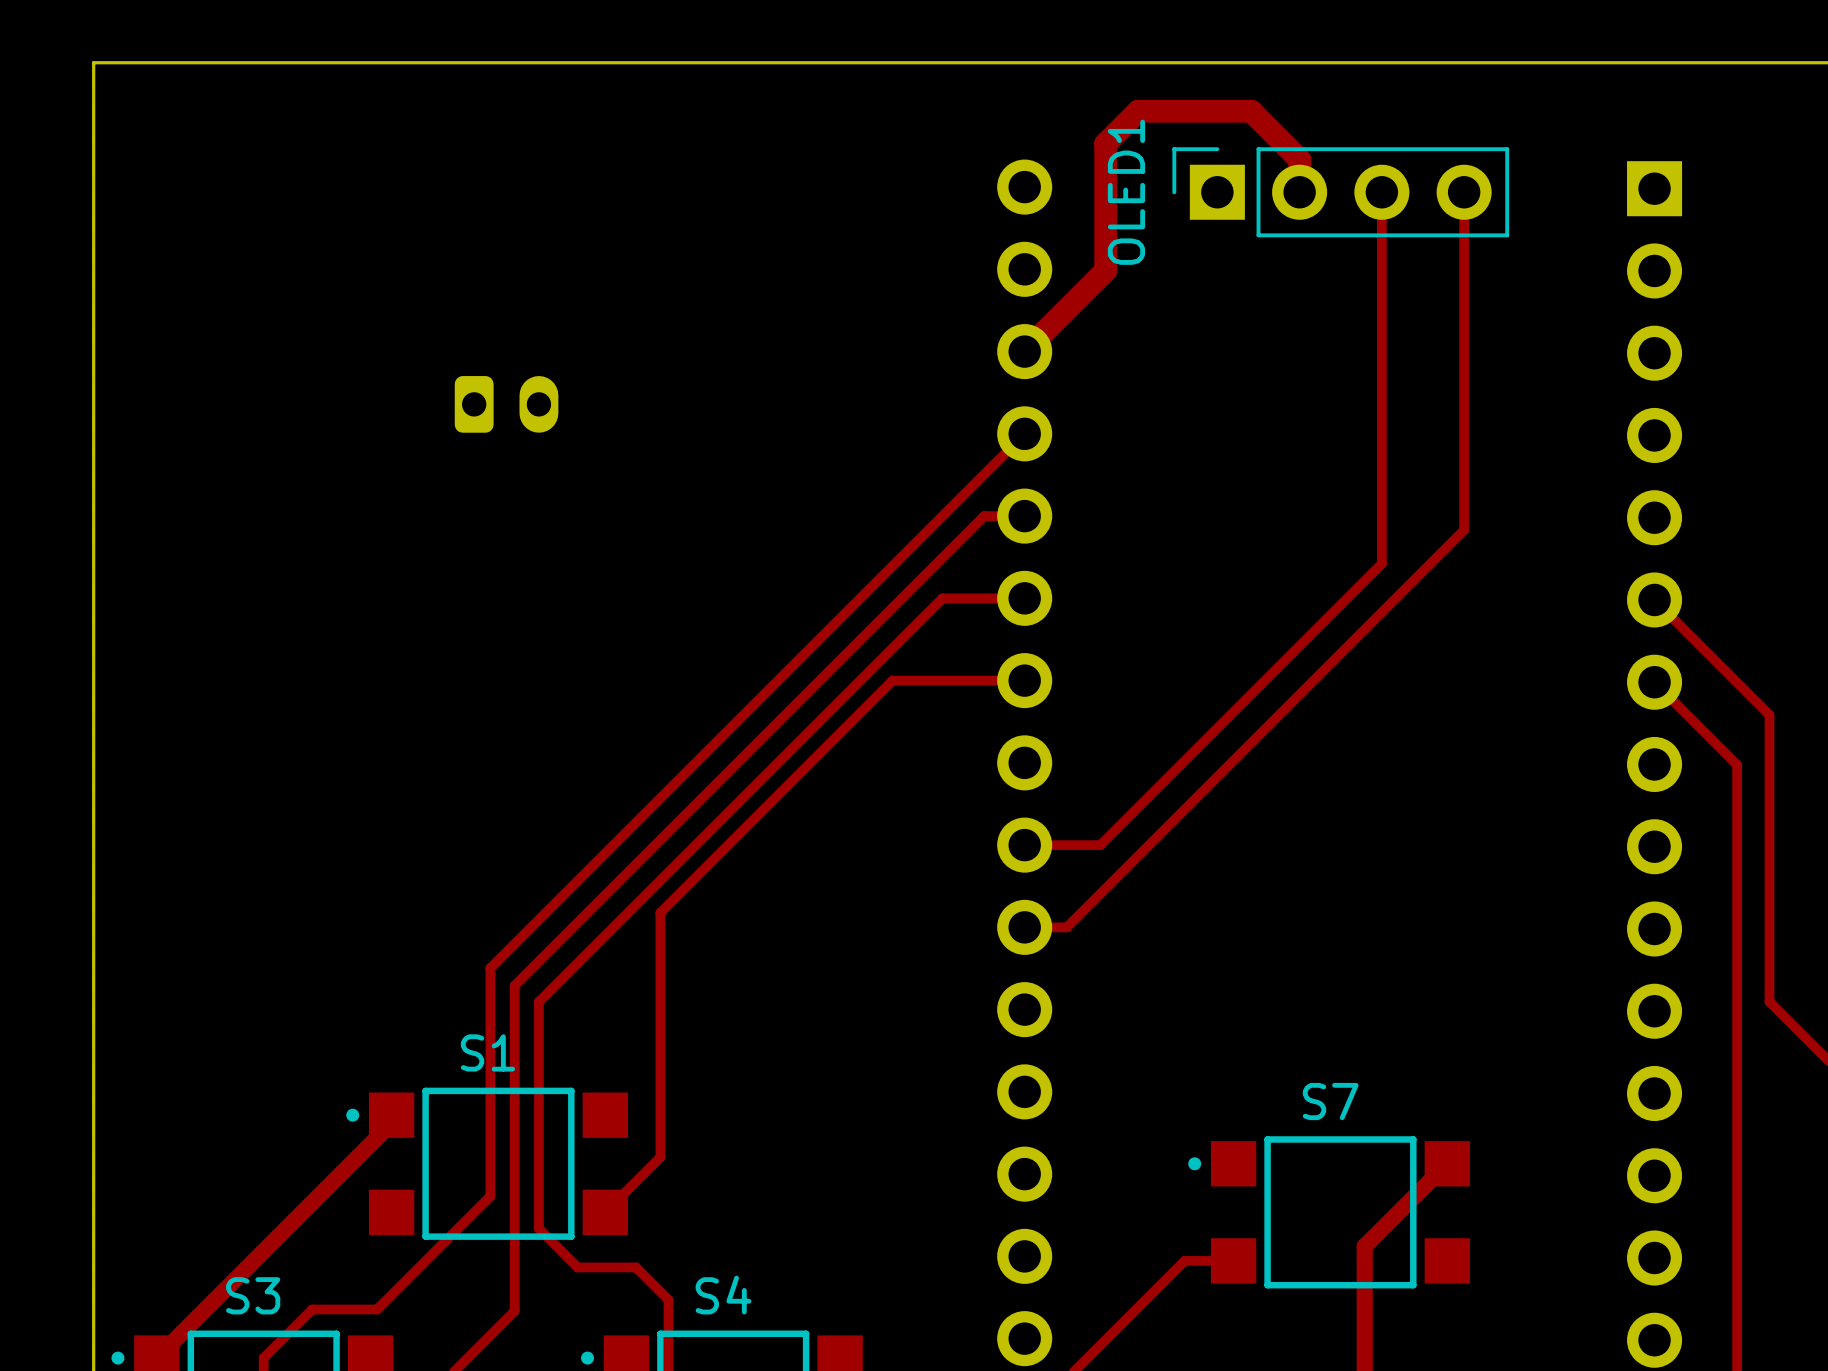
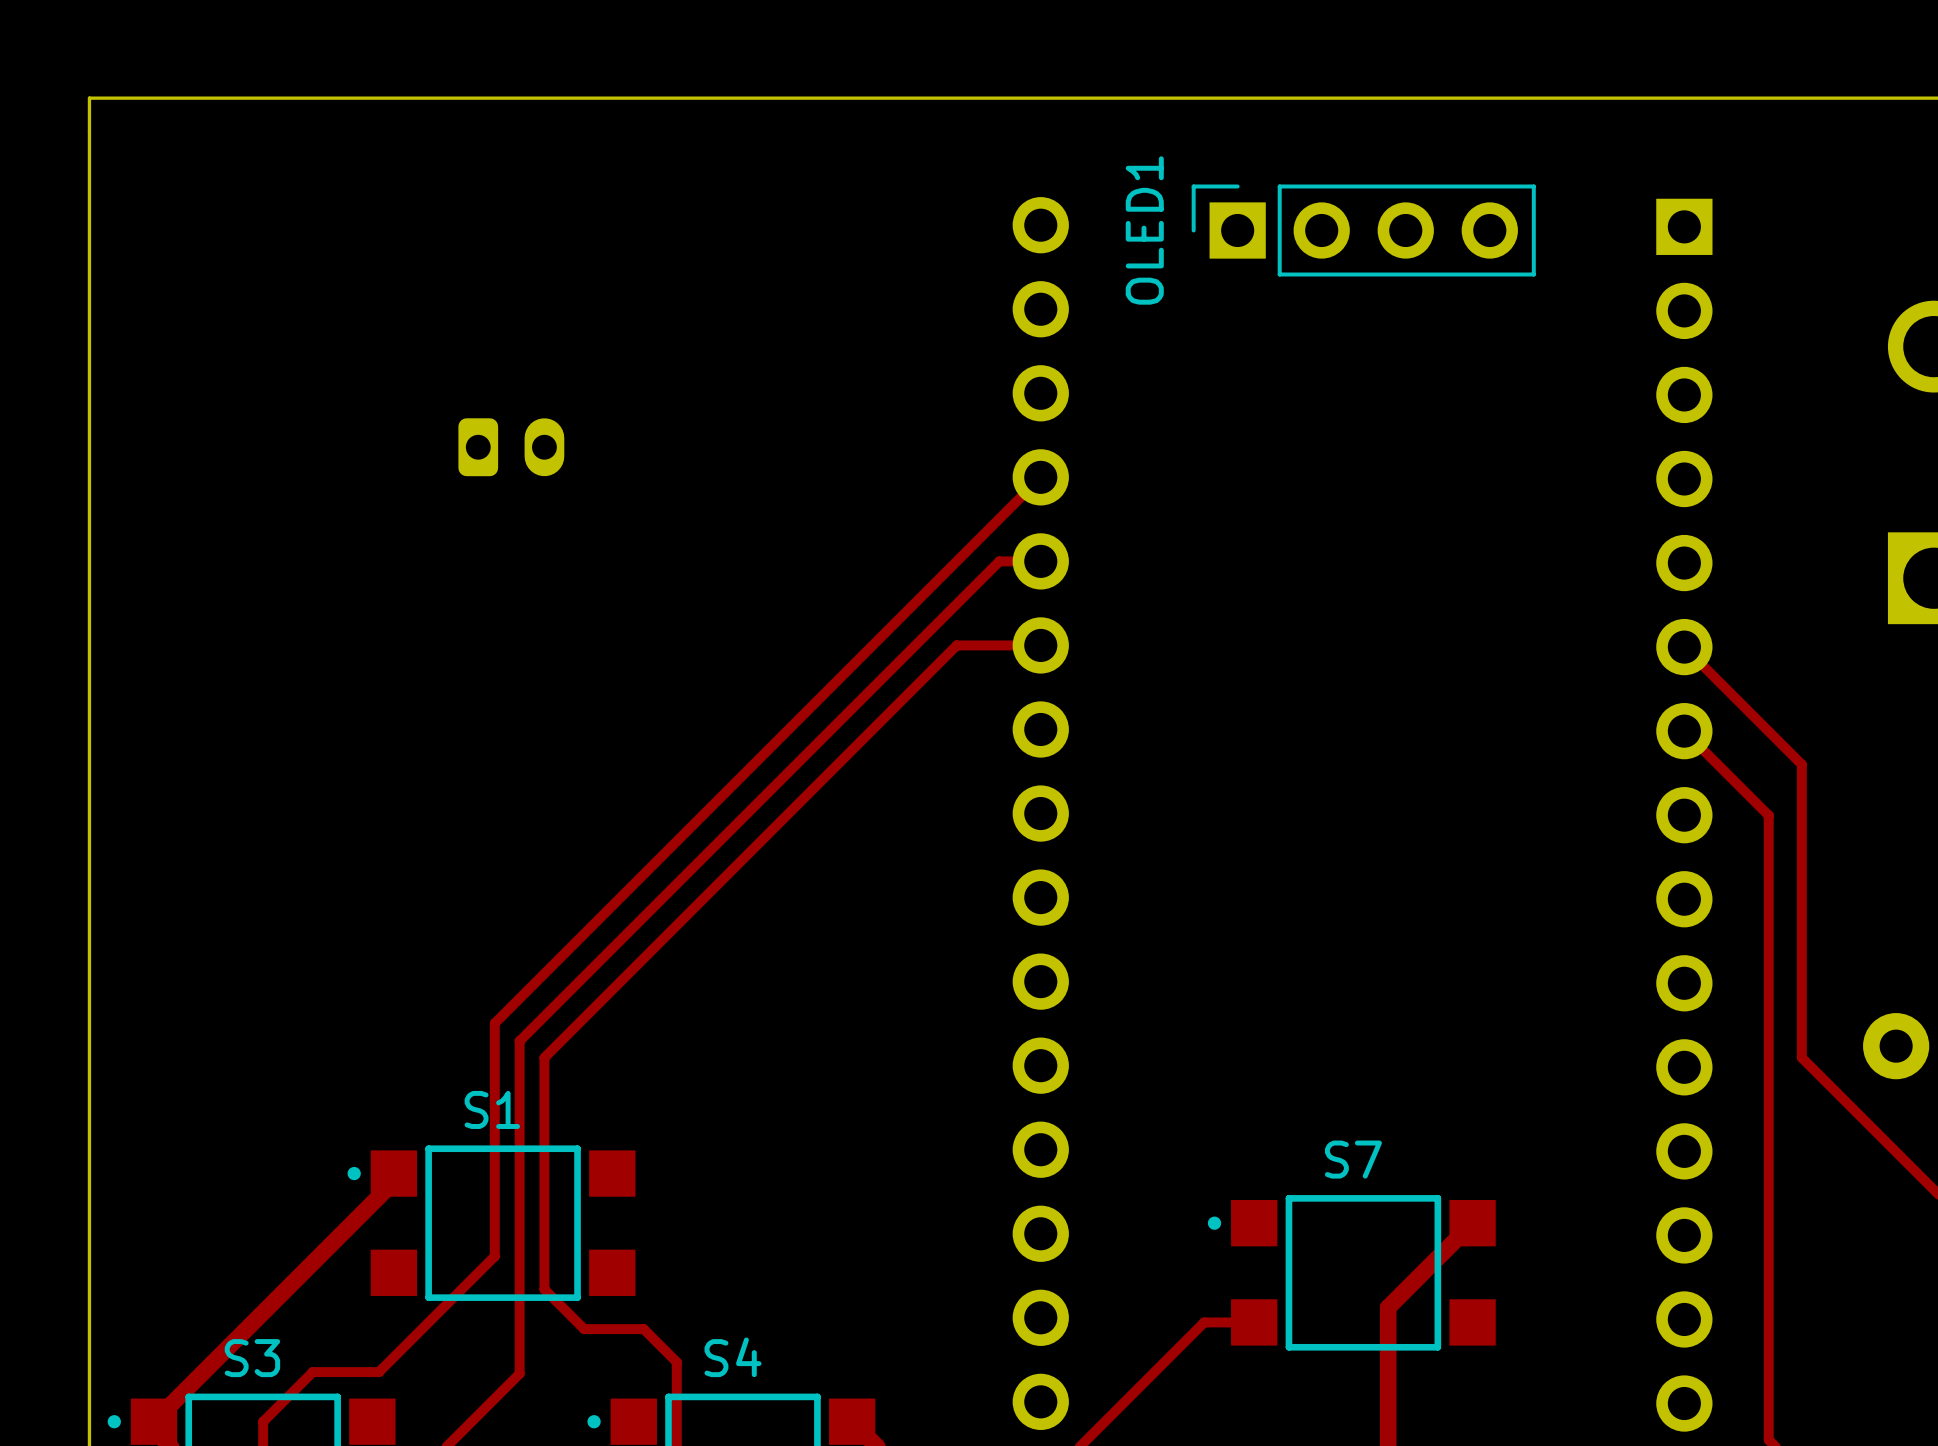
track: (1299, 192) (1299, 159) (1251, 111) (1138, 111) (1105, 143) (1105, 270) (1024, 351) -> none
track: (1381, 192) (1381, 563) (1100, 845) (1024, 845) -> none
track: (1464, 192) (1464, 530) (1066, 927) (1024, 927) -> none
track: (1024, 680) (892, 680) (660, 912) (660, 1157) (605, 1212) -> none

